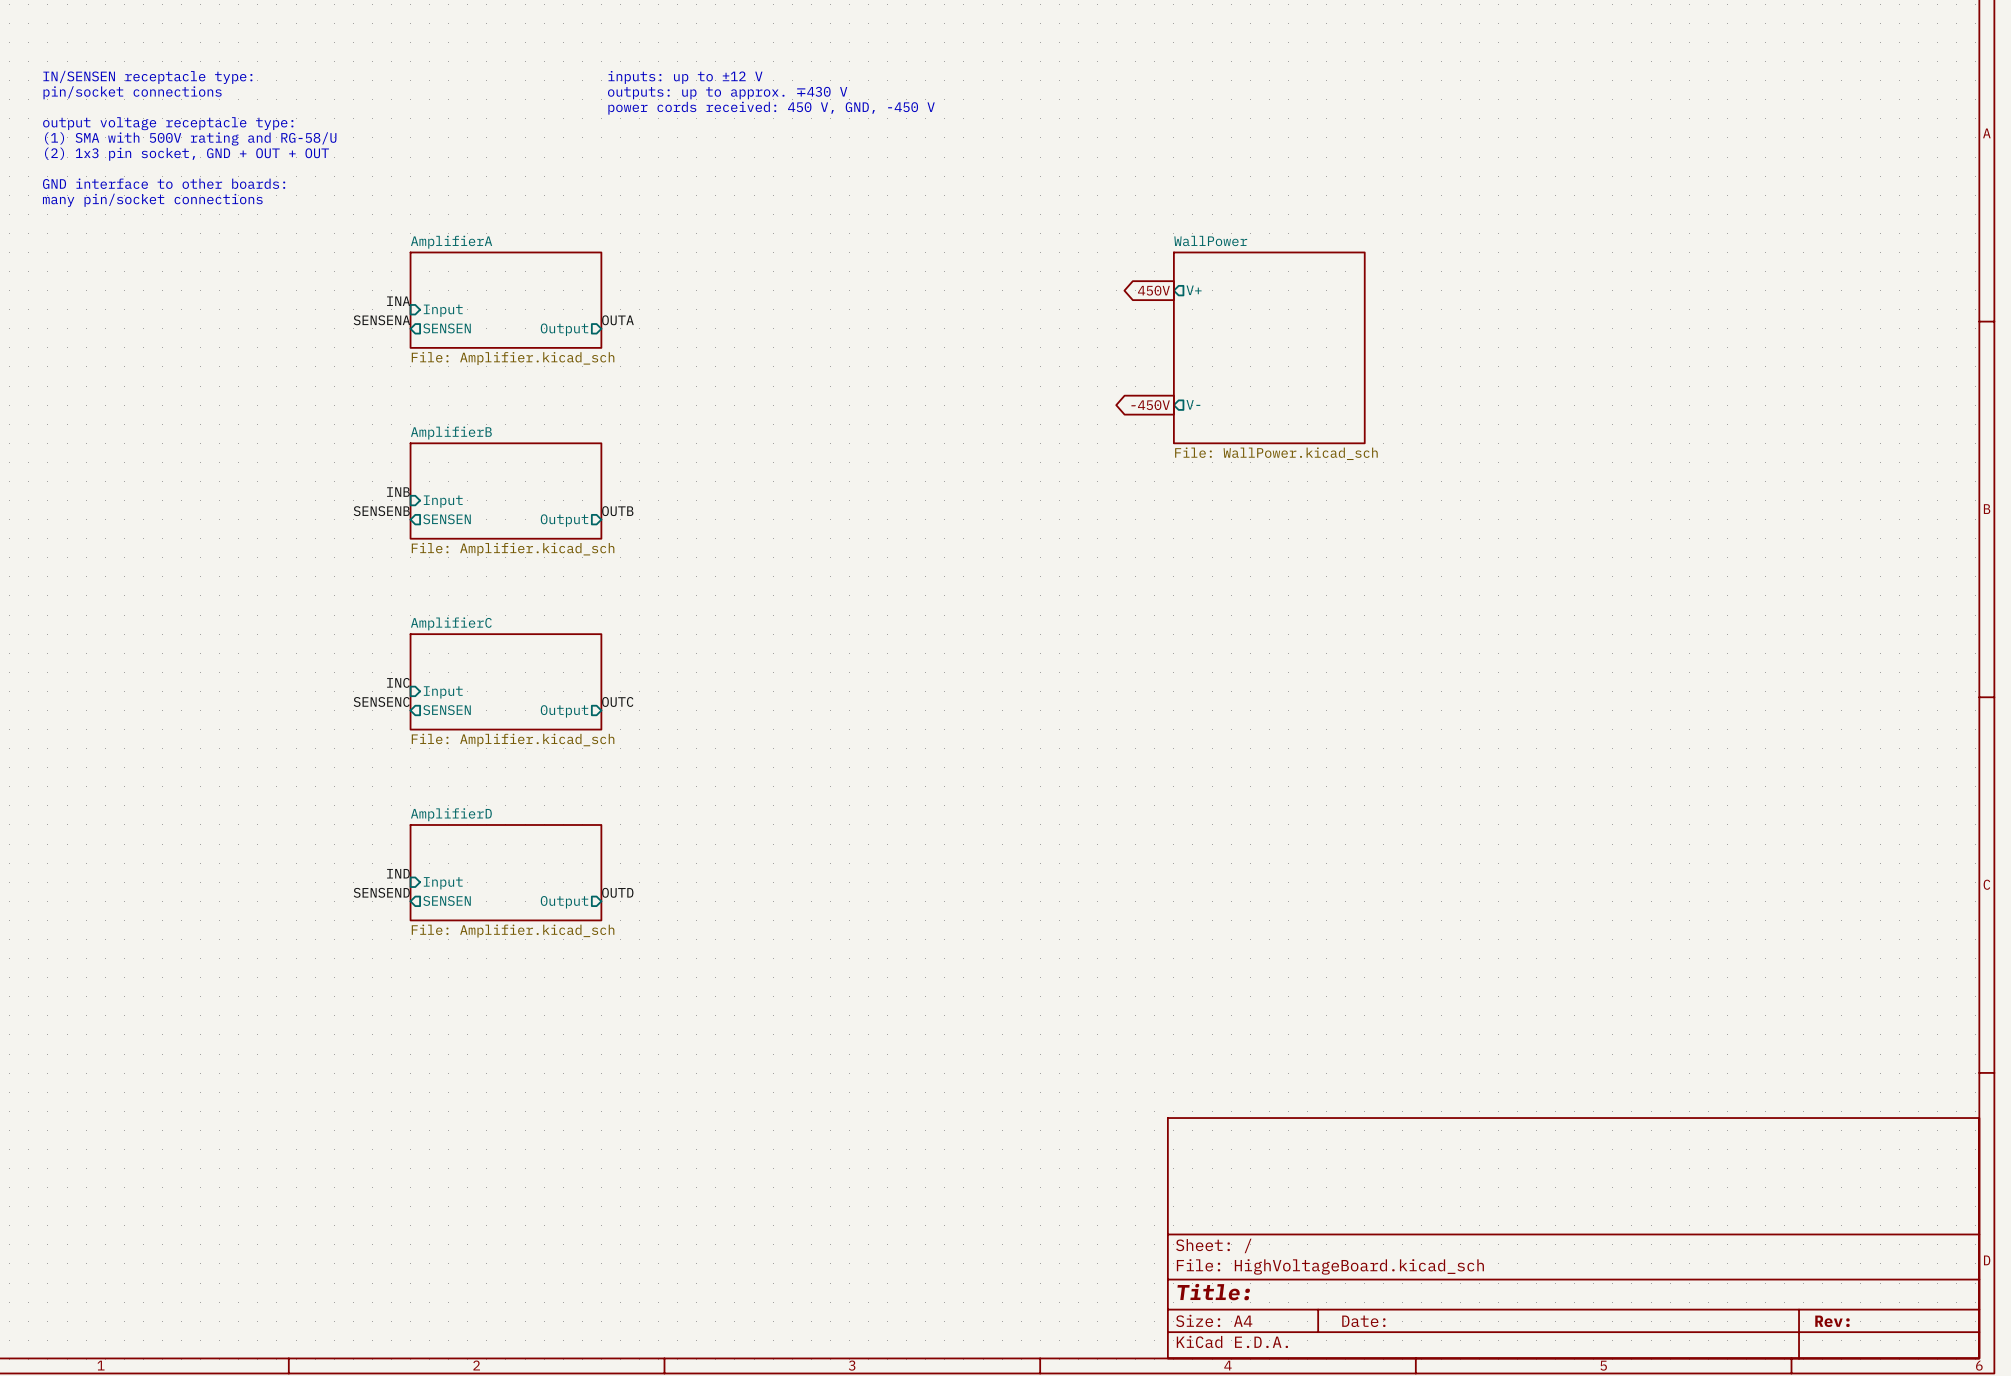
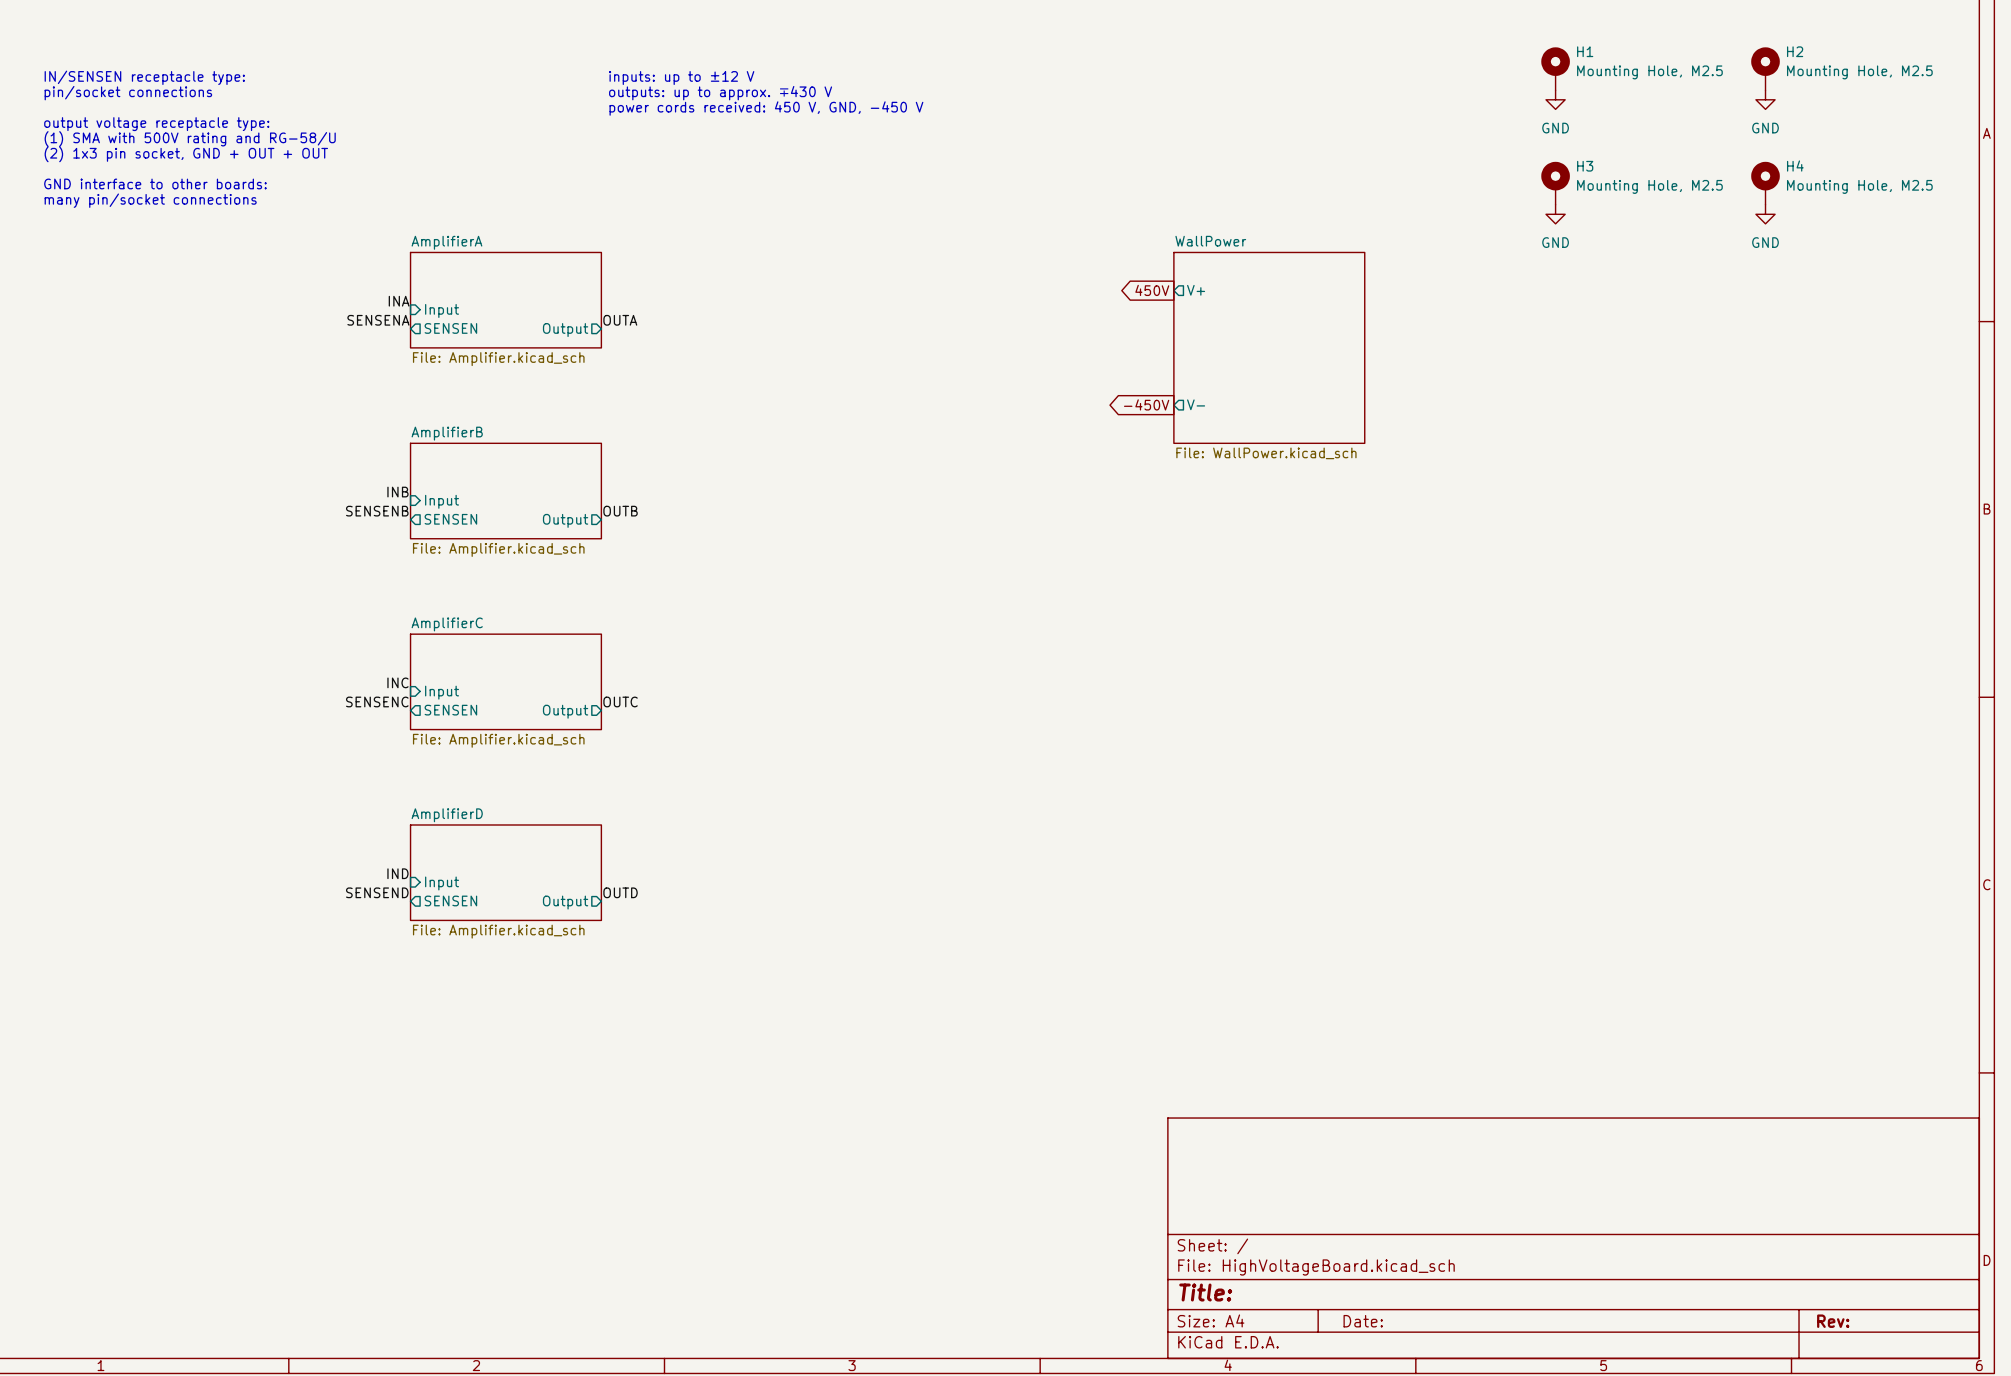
H1: none -> Mounting Hole, M2.5 (1555, 68)
H2: none -> Mounting Hole, M2.5 (1765, 68)
power symbol: none -> GND (1555, 99)
power symbol: none -> GND (1765, 99)
H3: none -> Mounting Hole, M2.5 (1555, 183)
H4: none -> Mounting Hole, M2.5 (1765, 183)
power symbol: none -> GND (1555, 214)
power symbol: none -> GND (1765, 214)

